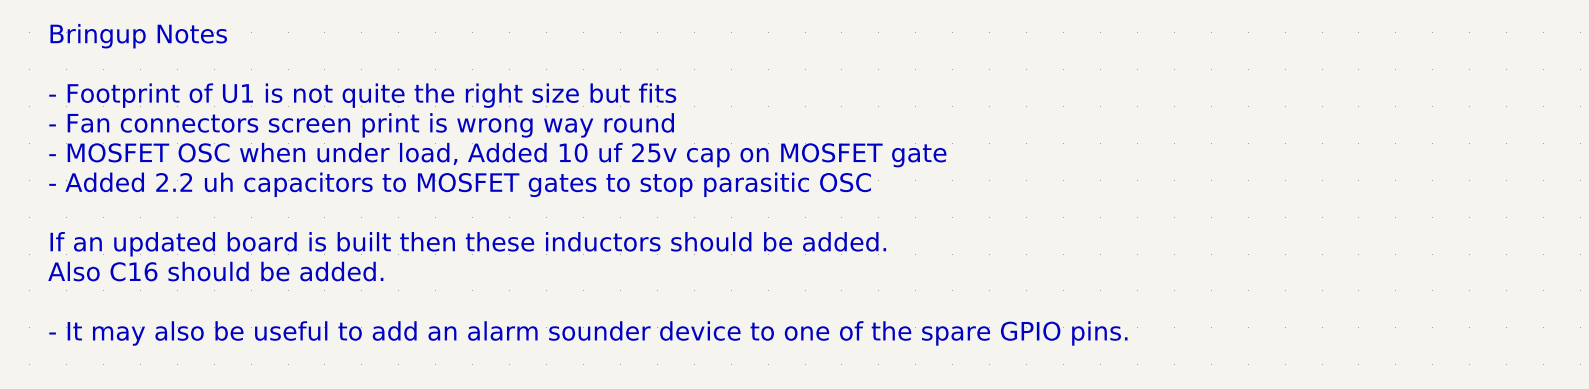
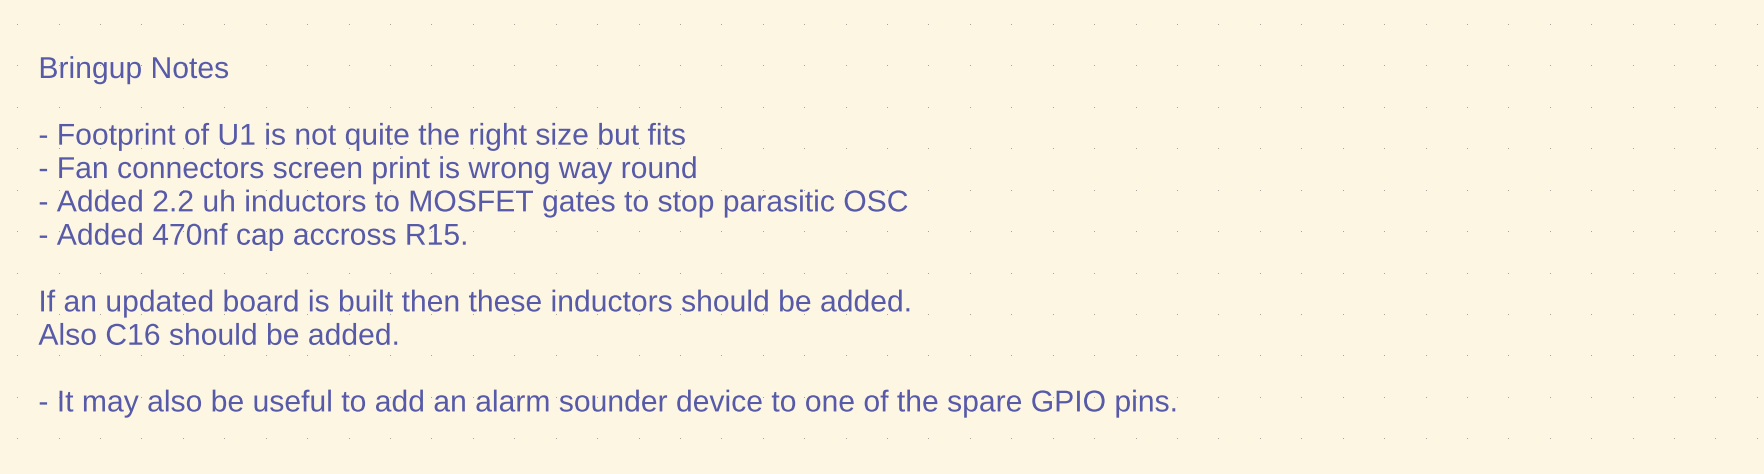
text: - MOSFET OSC when under load, Added 10 uf 25v cap on MOSFET gate (497, 155) -> - Added 2.2 uh inductors to MOSFET gates to stop parasitic OSC (473, 203)
text: - Added 2.2 uh capacitors to MOSFET gates to stop parasitic OSC (460, 184) -> - Added 470nf cap accross R15. (252, 236)

